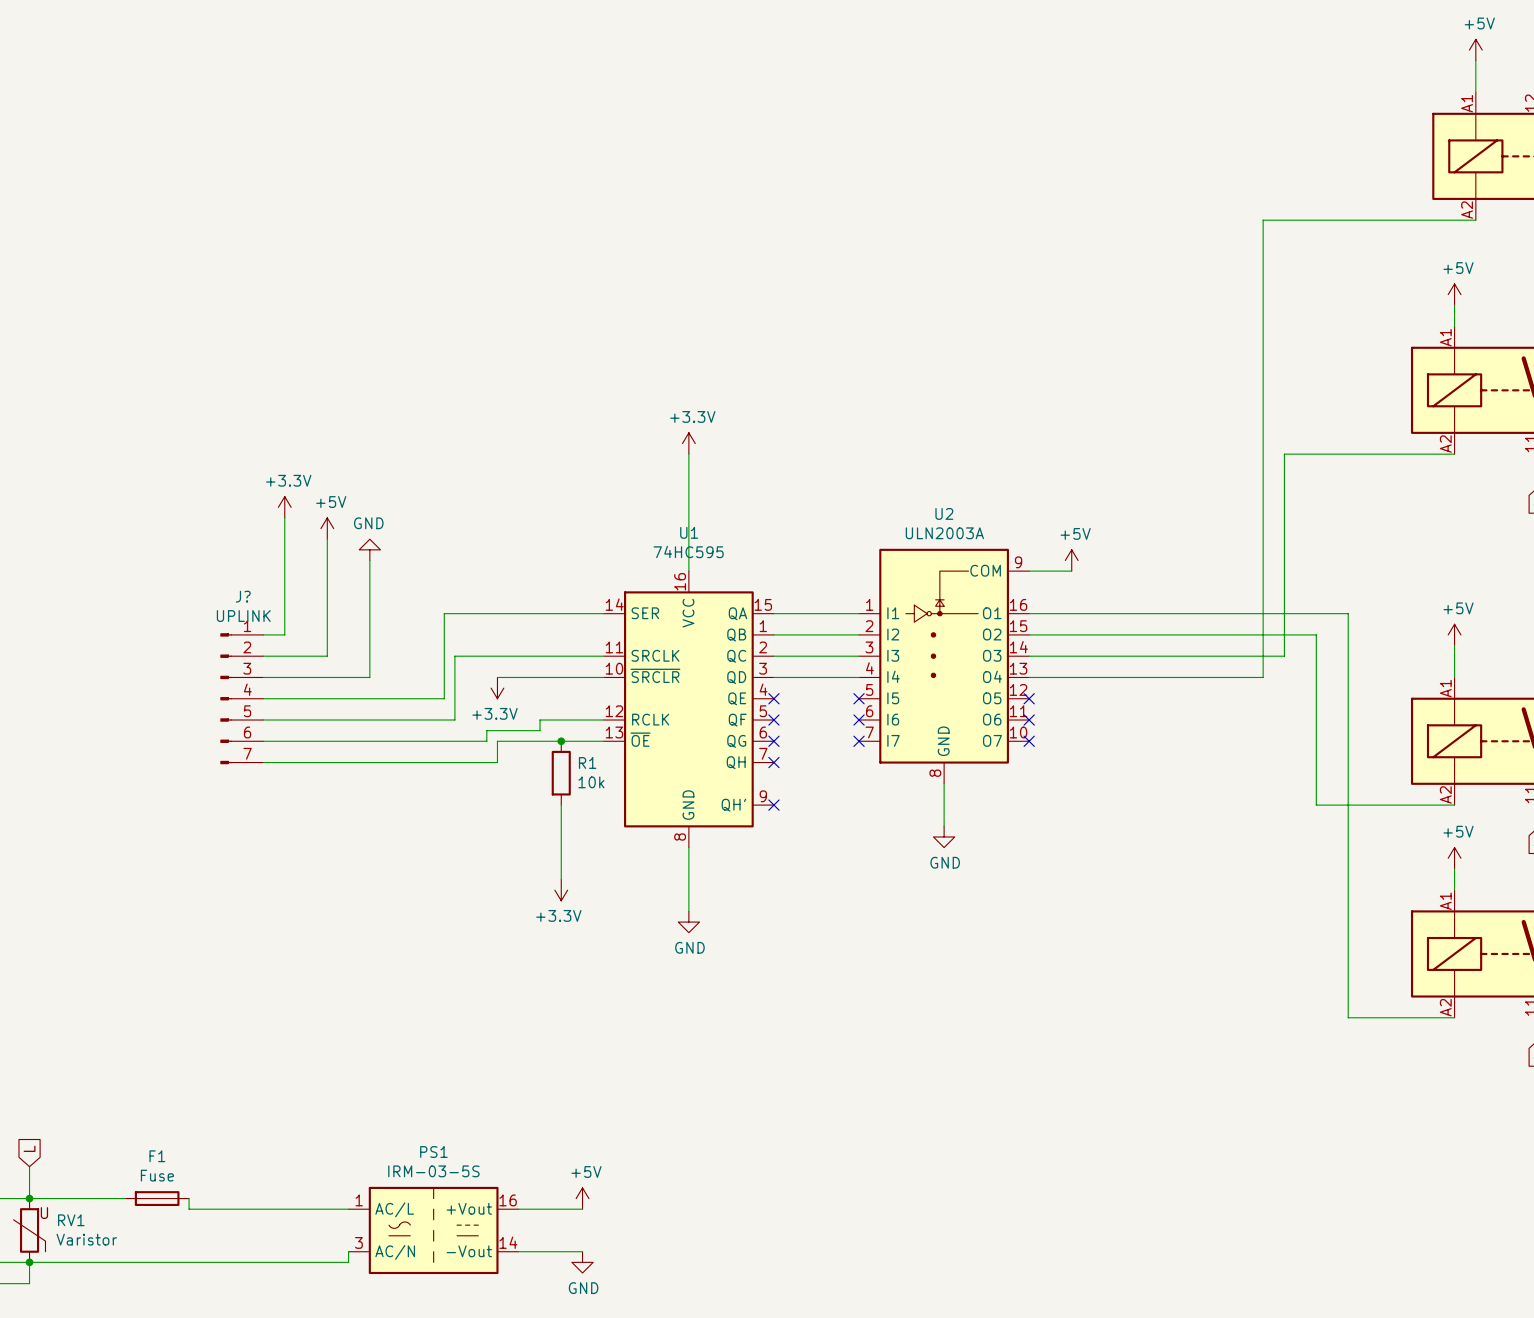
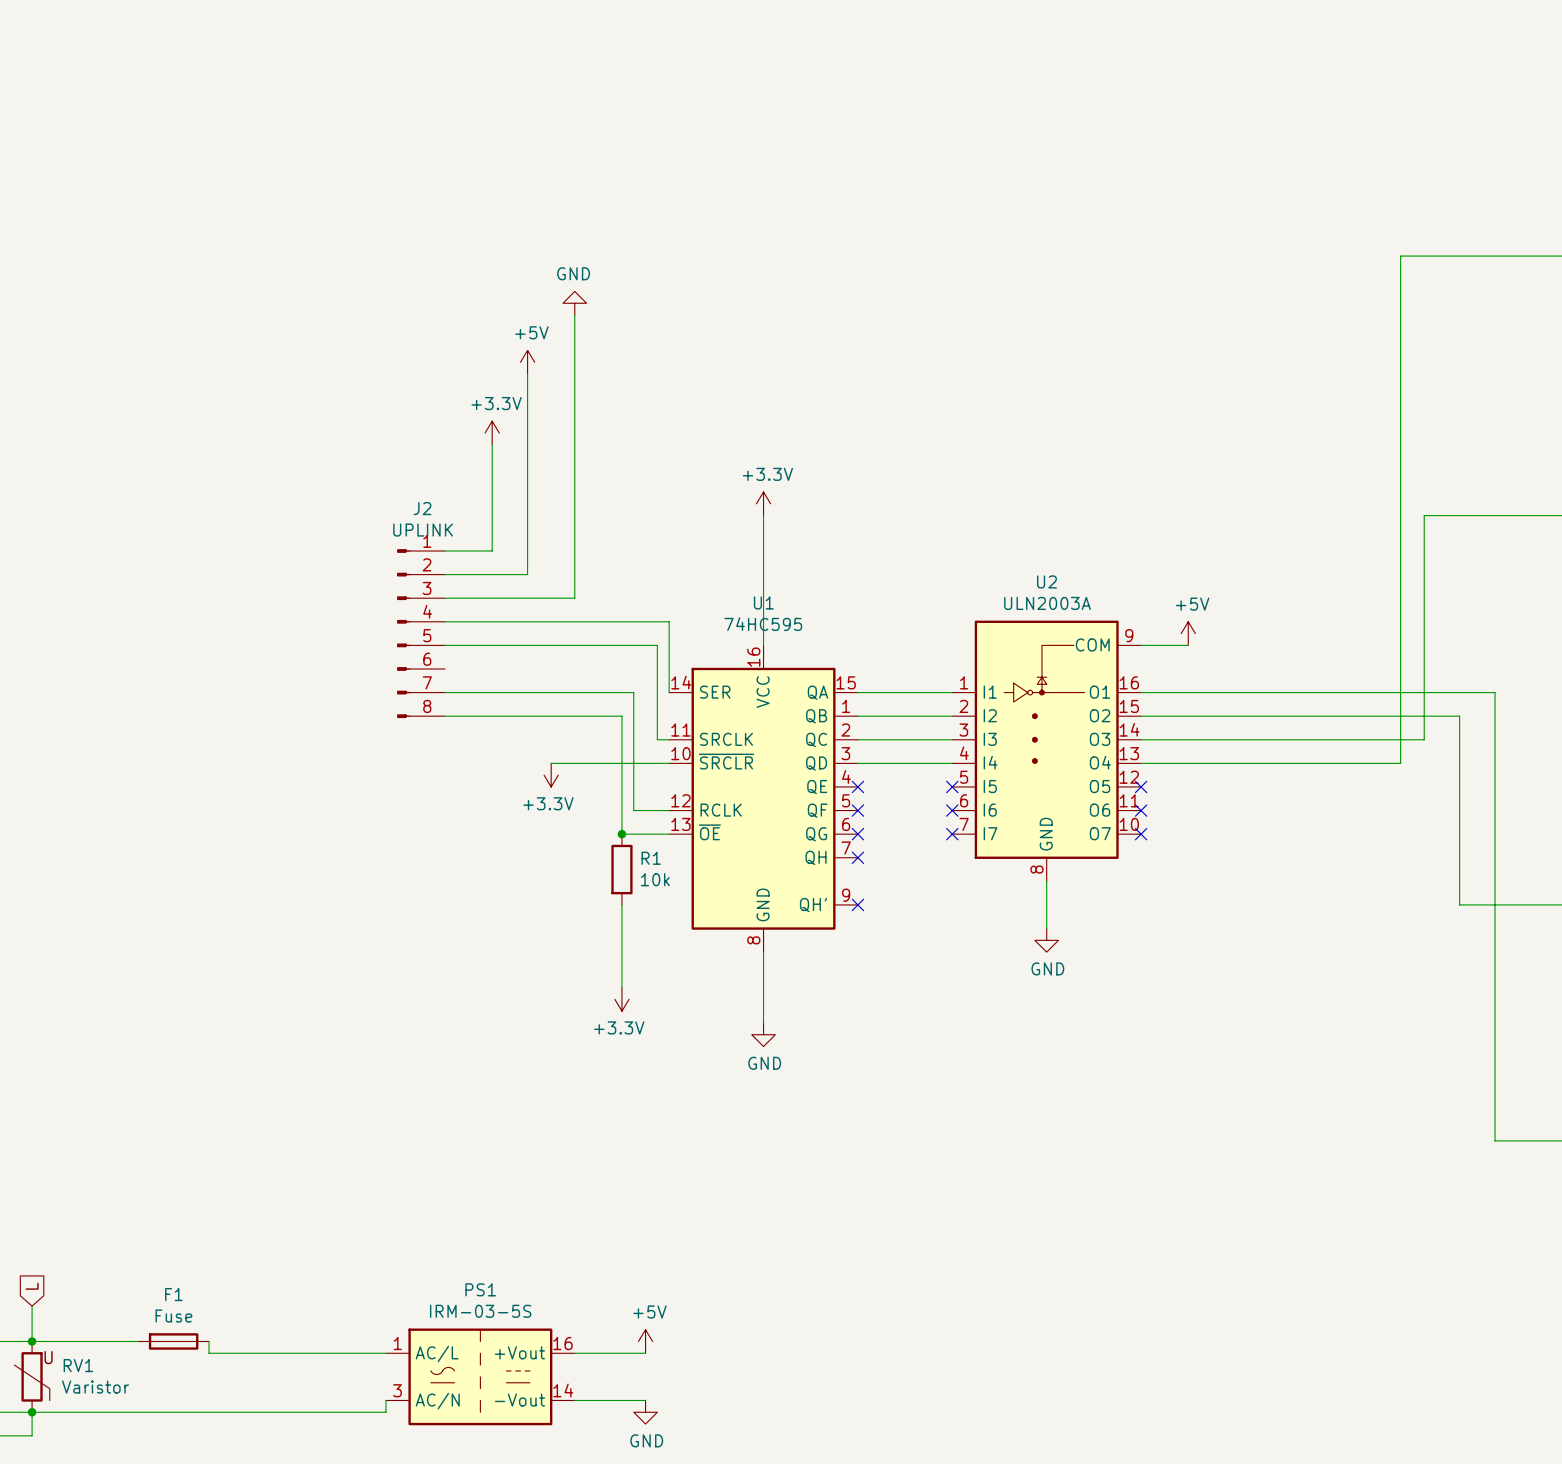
power symbol: none -> GND (574, 303)
wire: none -> (574, 315) (574, 598) (444, 598)
power symbol: none -> +5V (527, 362)
wire: none -> (527, 374) (527, 574) (444, 574)
wire: none -> (492, 444) (492, 551) (444, 551)
power symbol position: +3.3V (284, 507) -> +3.3V (492, 433)
wire: (284, 517) (284, 634) (263, 634) -> none
power symbol: +5V (327, 528) -> none
wire: (327, 539) (327, 656) (263, 656) -> none
power symbol: GND (369, 549) -> none
wire: none -> (444, 621) (669, 621) (669, 692)
wire: (369, 560) (369, 677) (263, 677) -> none
J2: none -> UPLINK (421, 633)
wire: (444, 613) (444, 698) (263, 698) -> (492, 692) (444, 692)
wire: (571, 613) (603, 613) -> (633, 692) (633, 810)
wire: (593, 656) (454, 656) (454, 720) (263, 720) -> (657, 739) (657, 645) (444, 645)
J?: UPLINK (241, 698) -> none
wire: (571, 720) (540, 720) (540, 730) (486, 730) (486, 741) (263, 741) -> none
wire: (561, 741) (497, 741) (497, 762) (263, 762) -> (621, 834) (621, 716) (444, 716)

